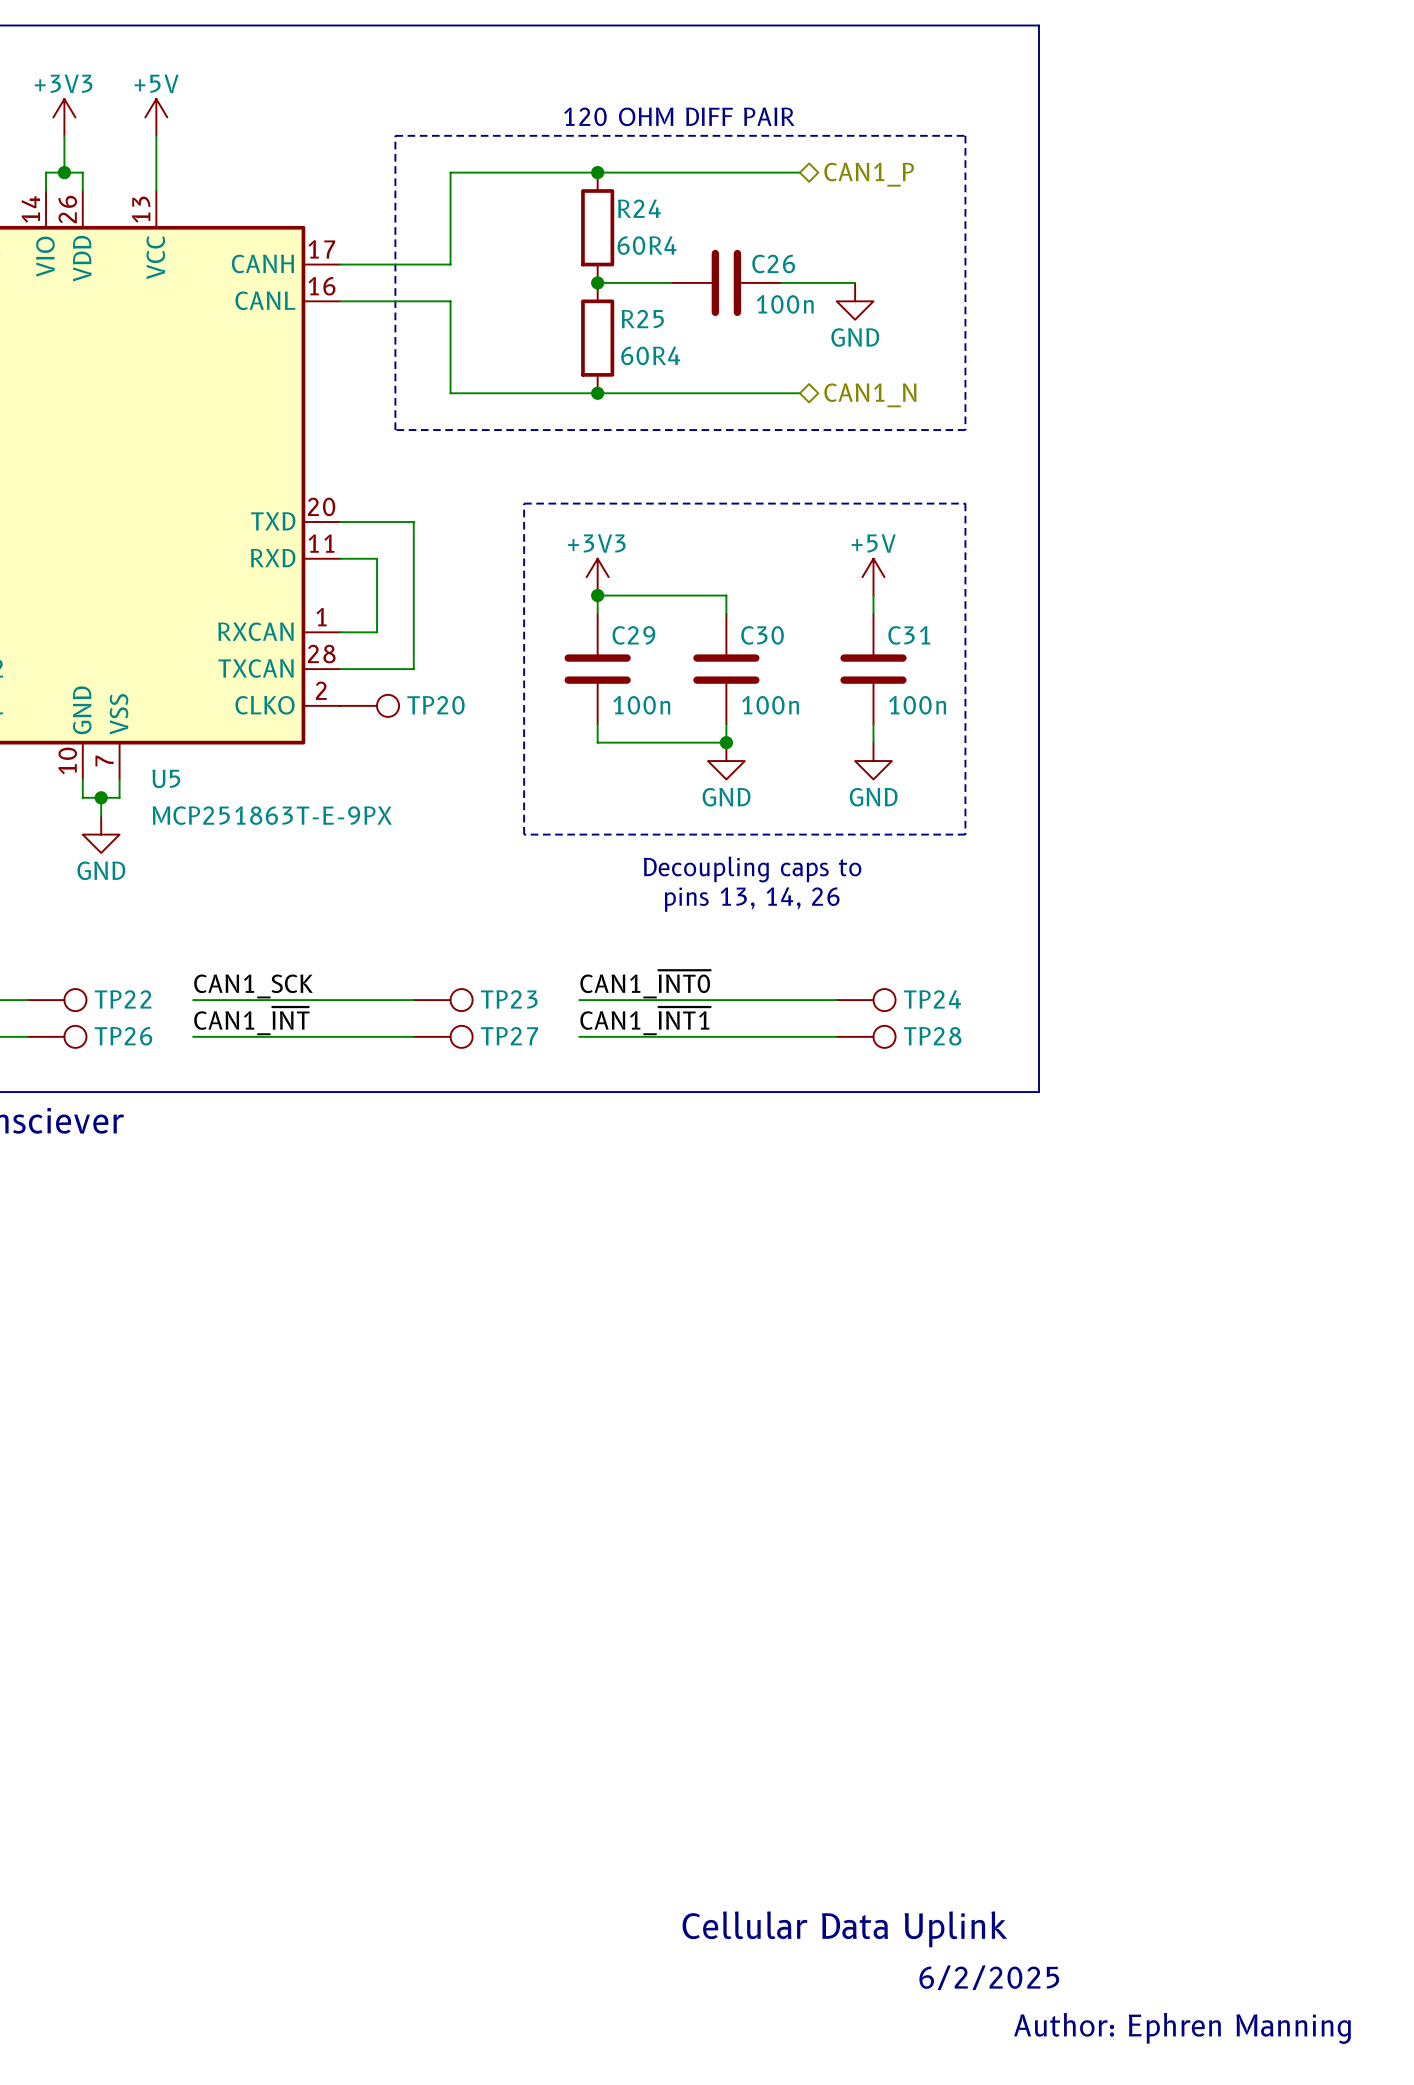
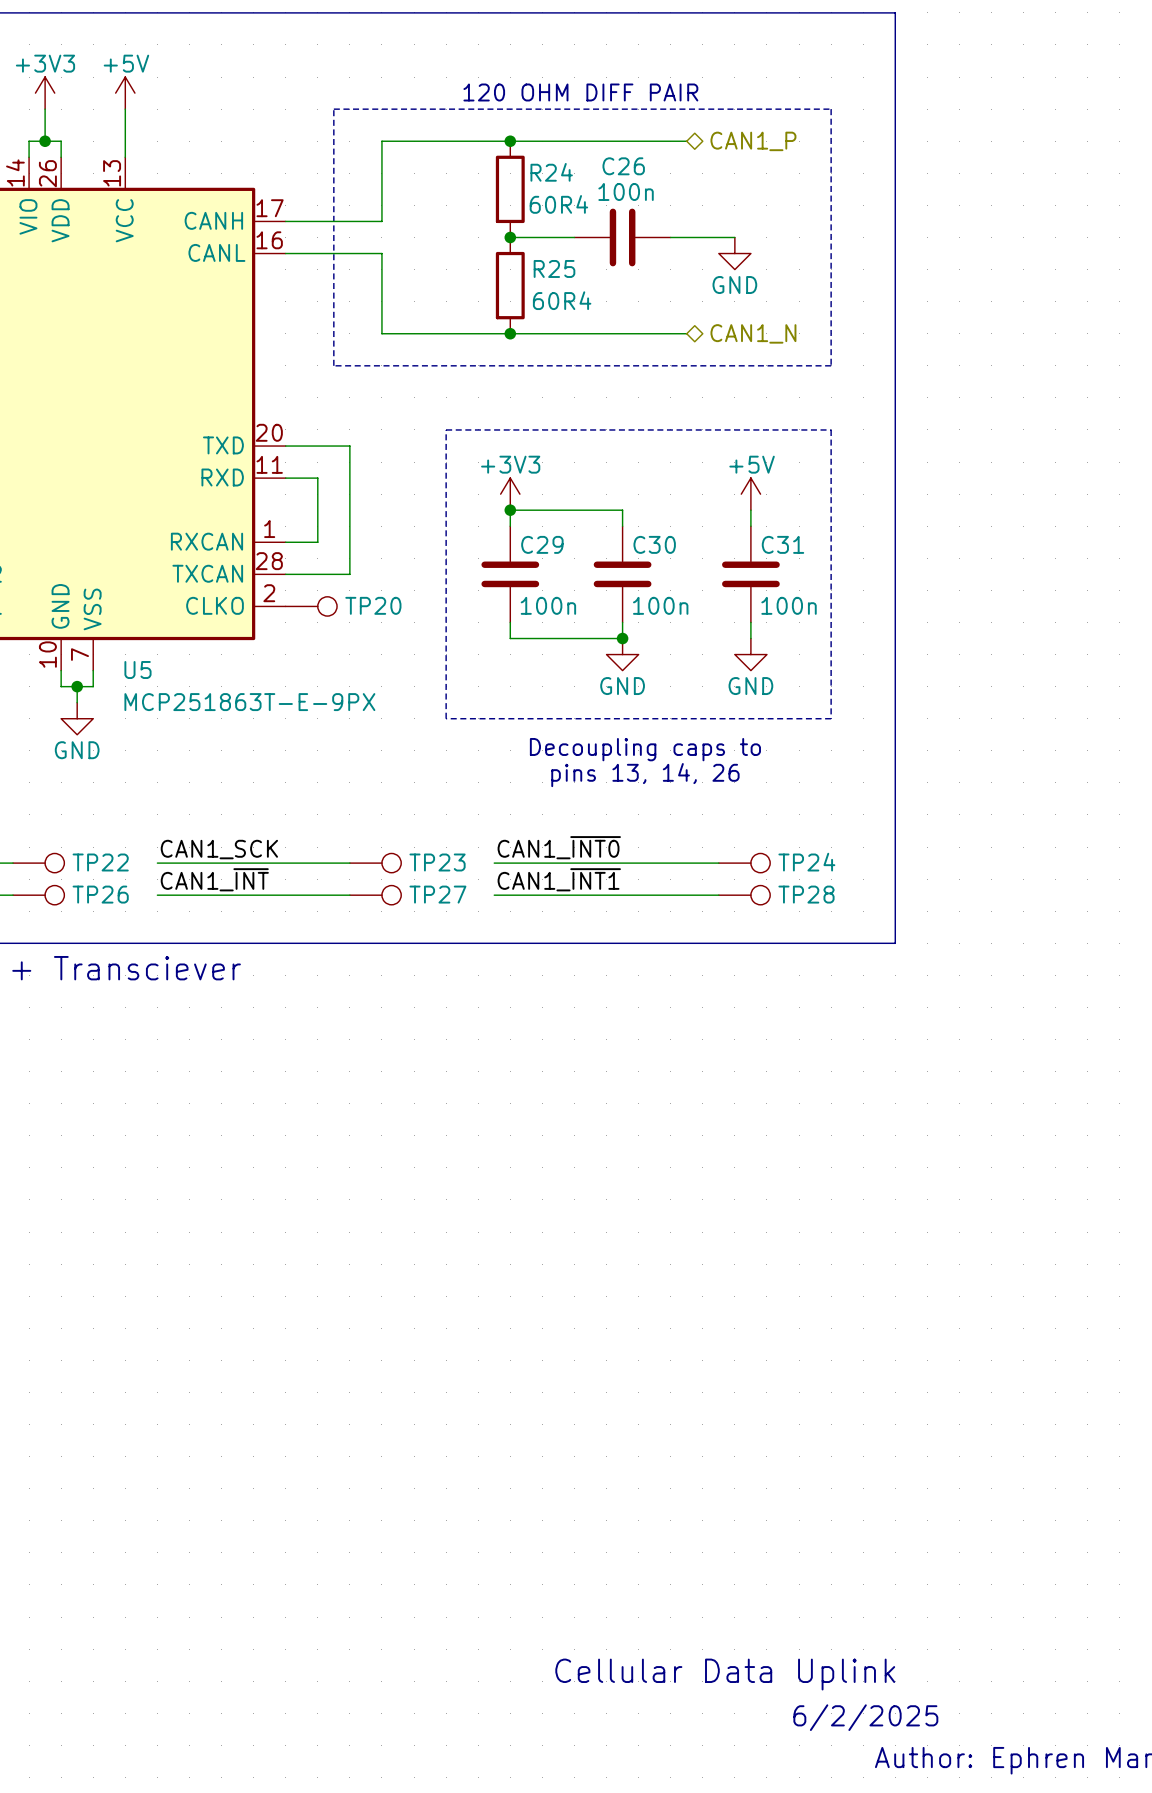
C26 name position: C26 (773, 263) -> C26 (623, 166)
C26 value position: 100n (785, 304) -> 100n (626, 191)

